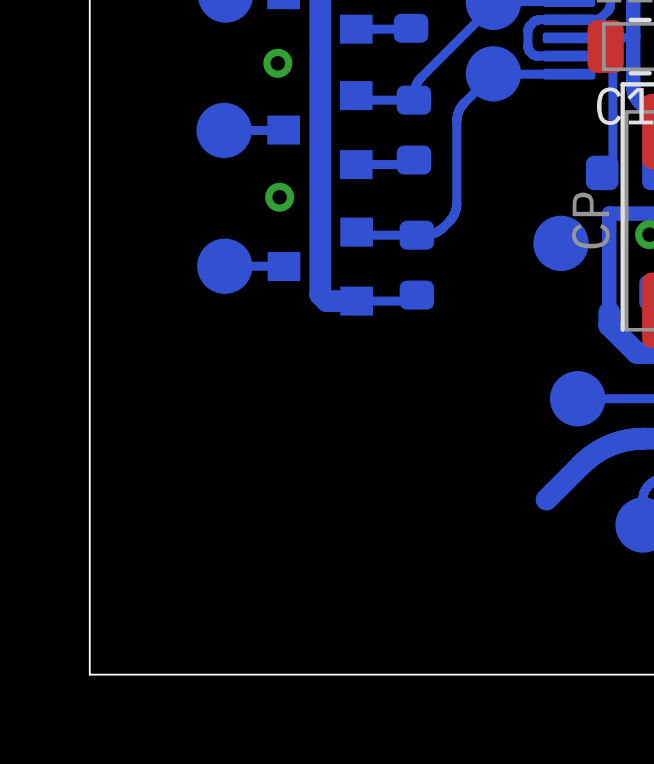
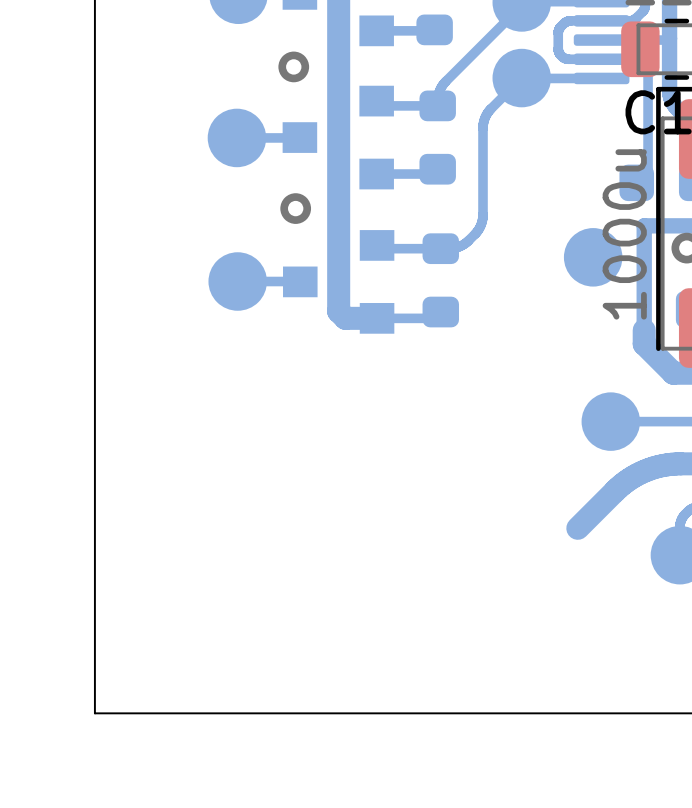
part value: CP (590, 220) -> 1000u (624, 234)

